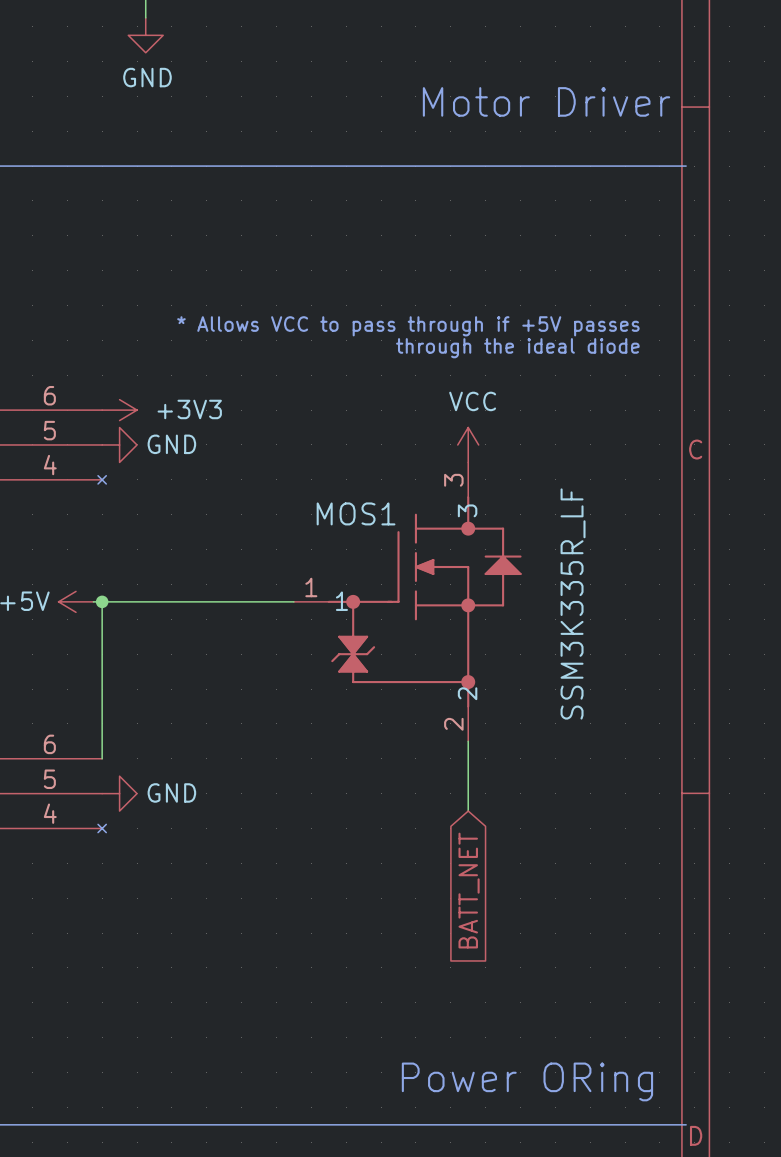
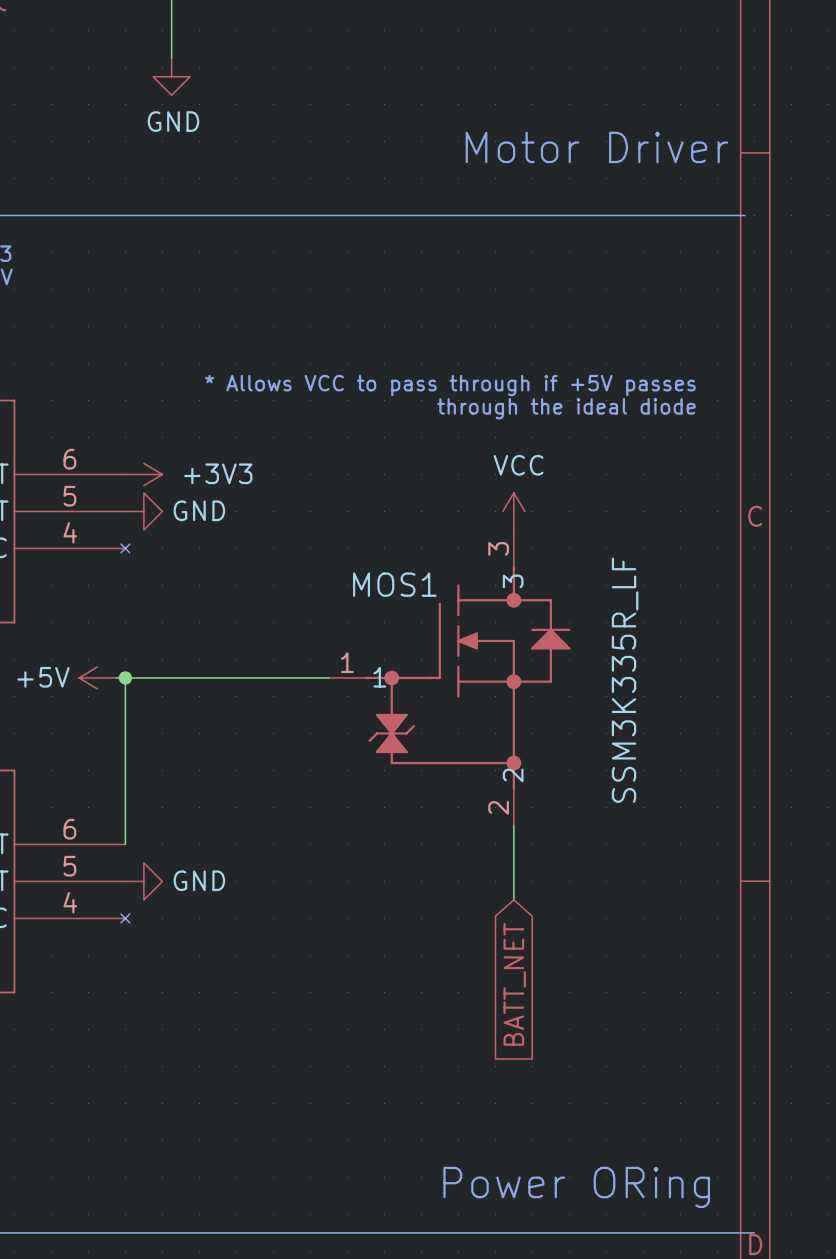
line: none -> (745, 1232) (754, 1232)

